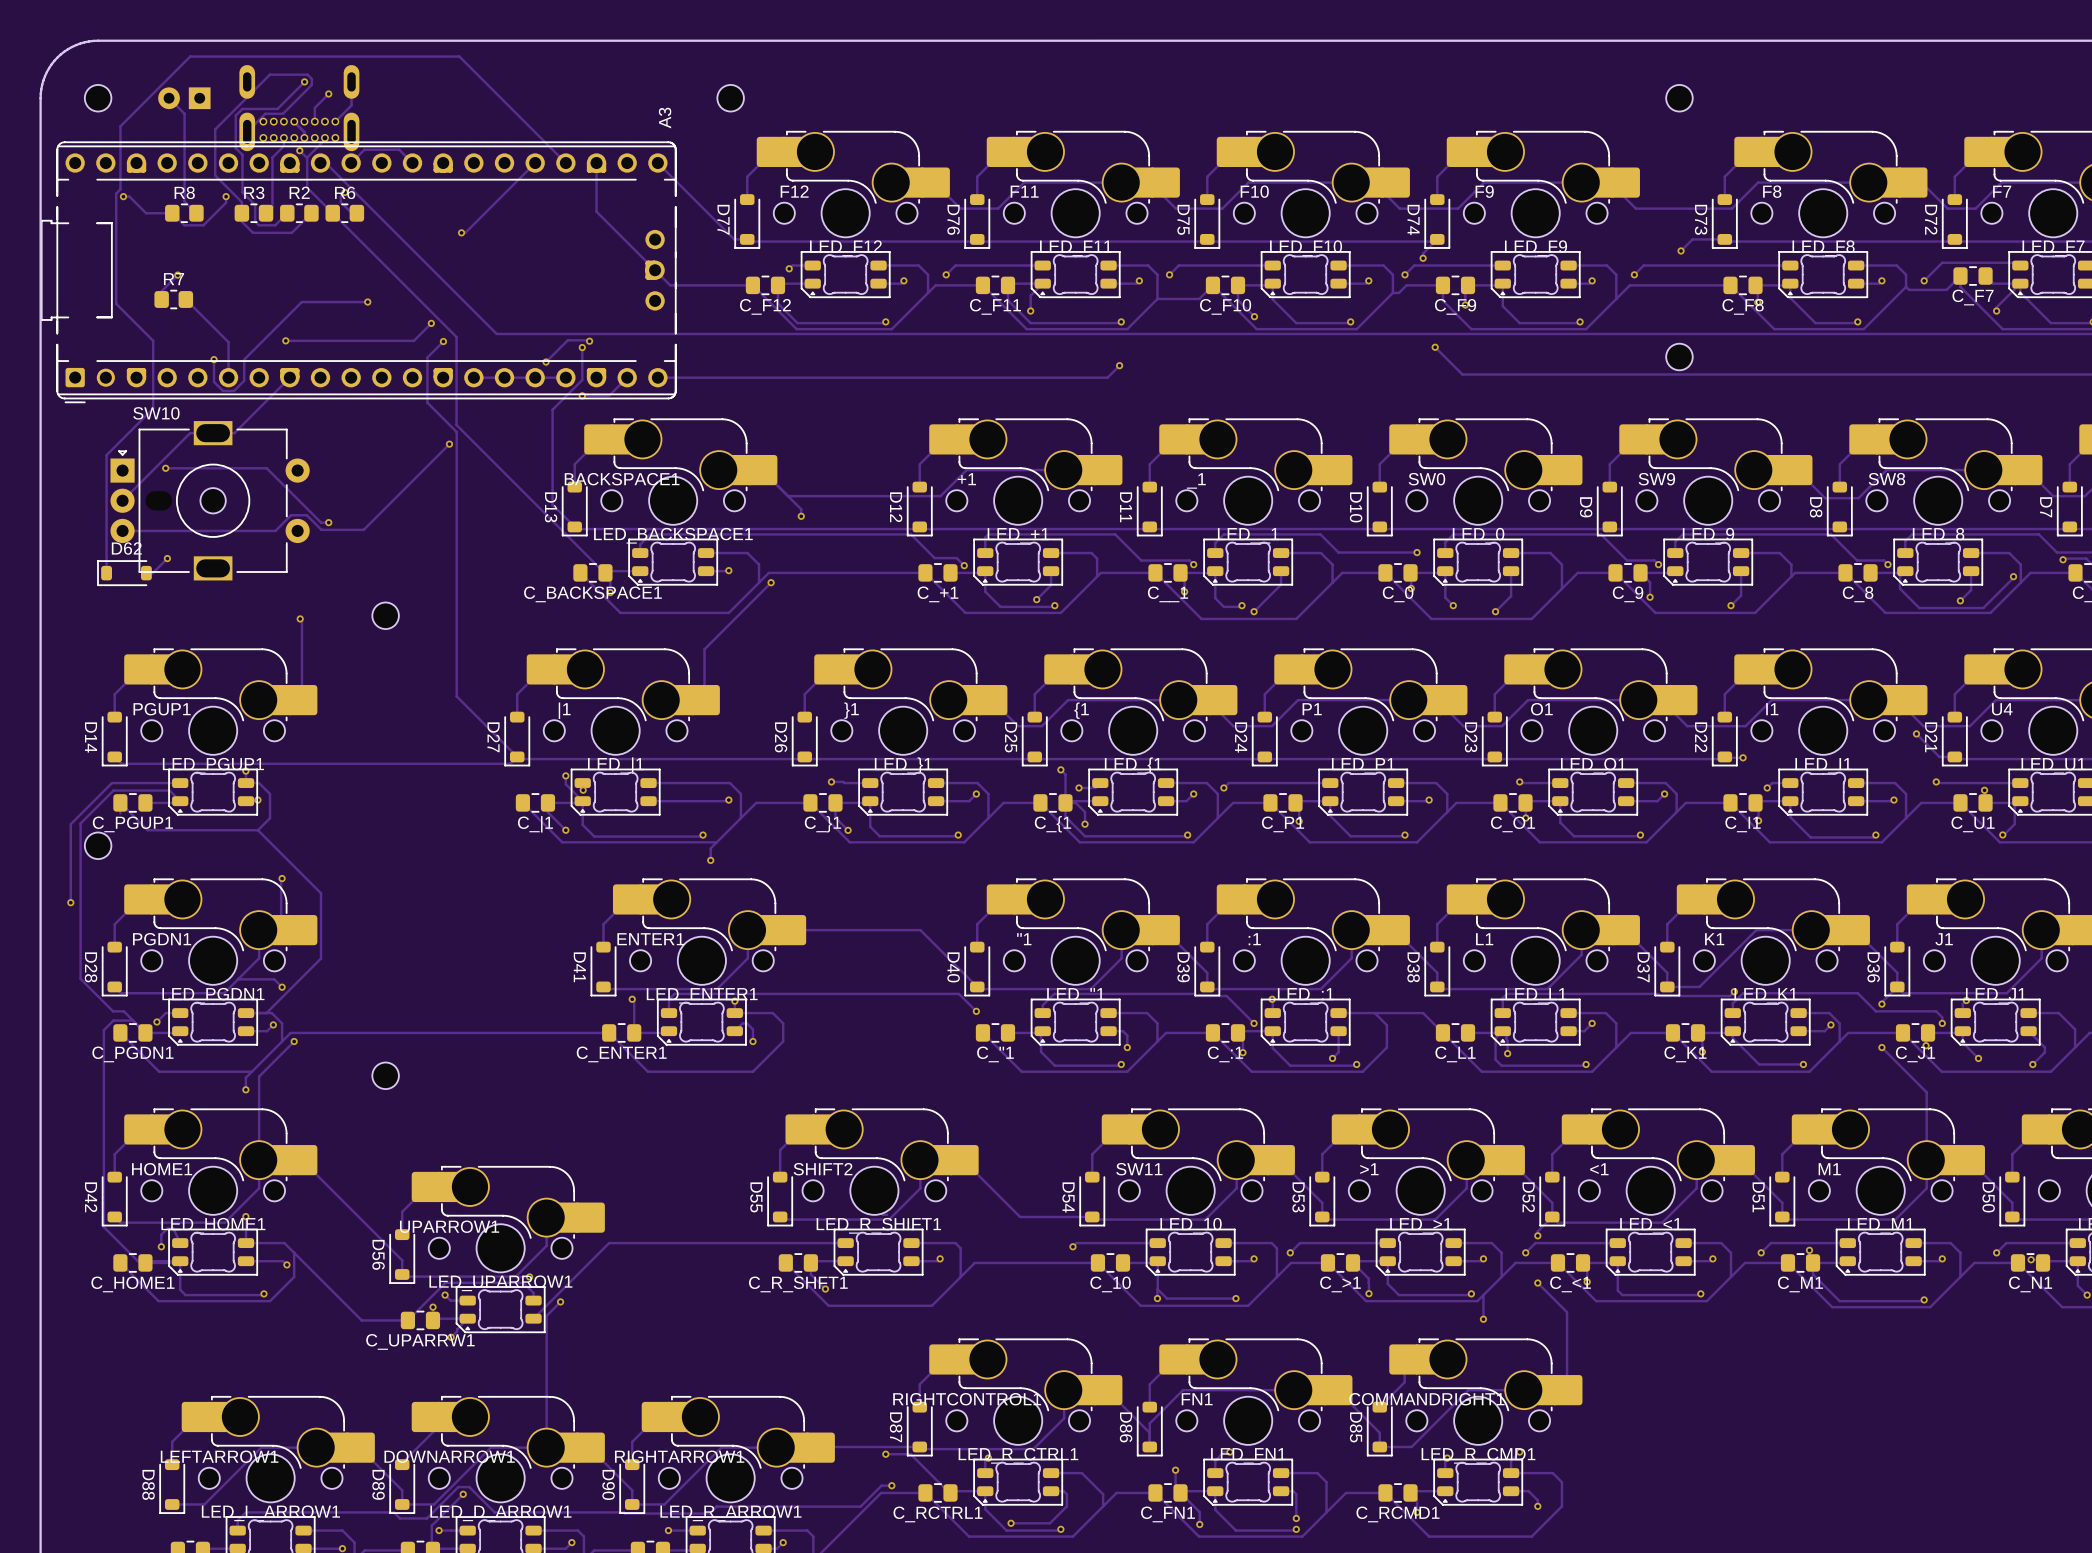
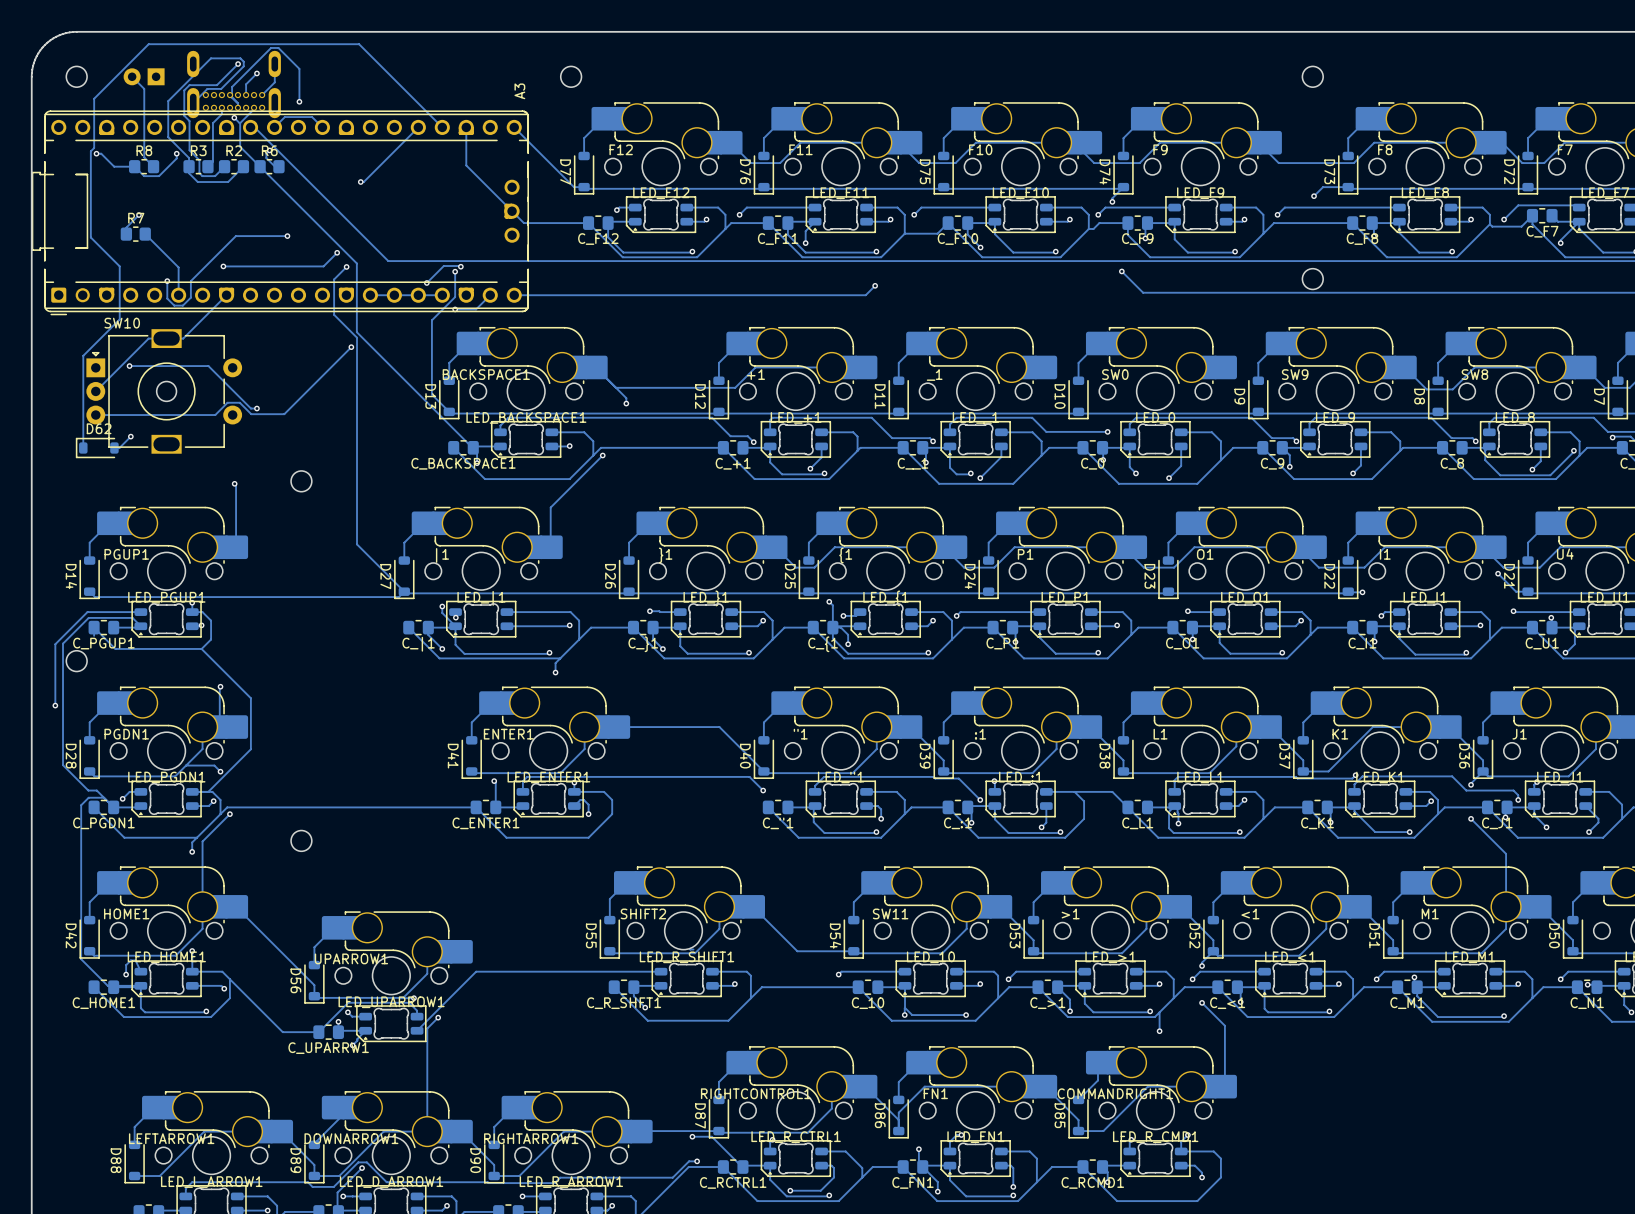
track: none -> (232, 97) (232, 86) (271, 47) (278, 47) (299, 68) (299, 101)
via: none -> (299, 101)

